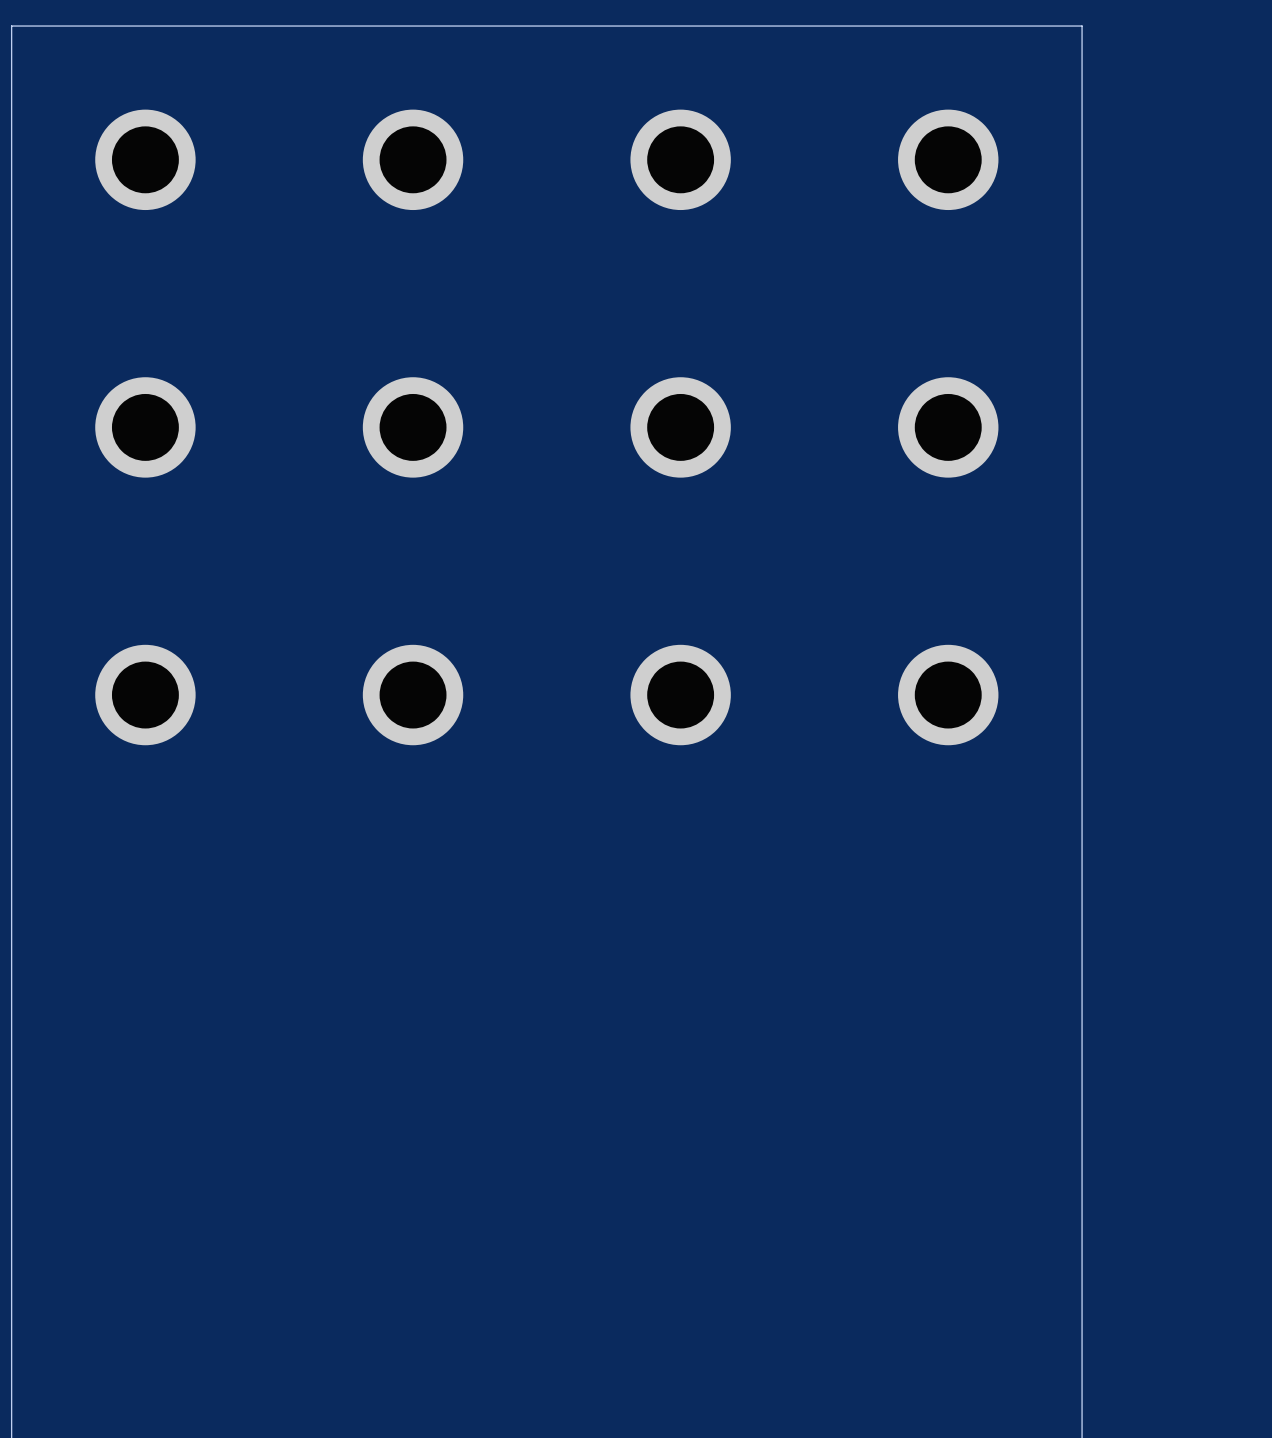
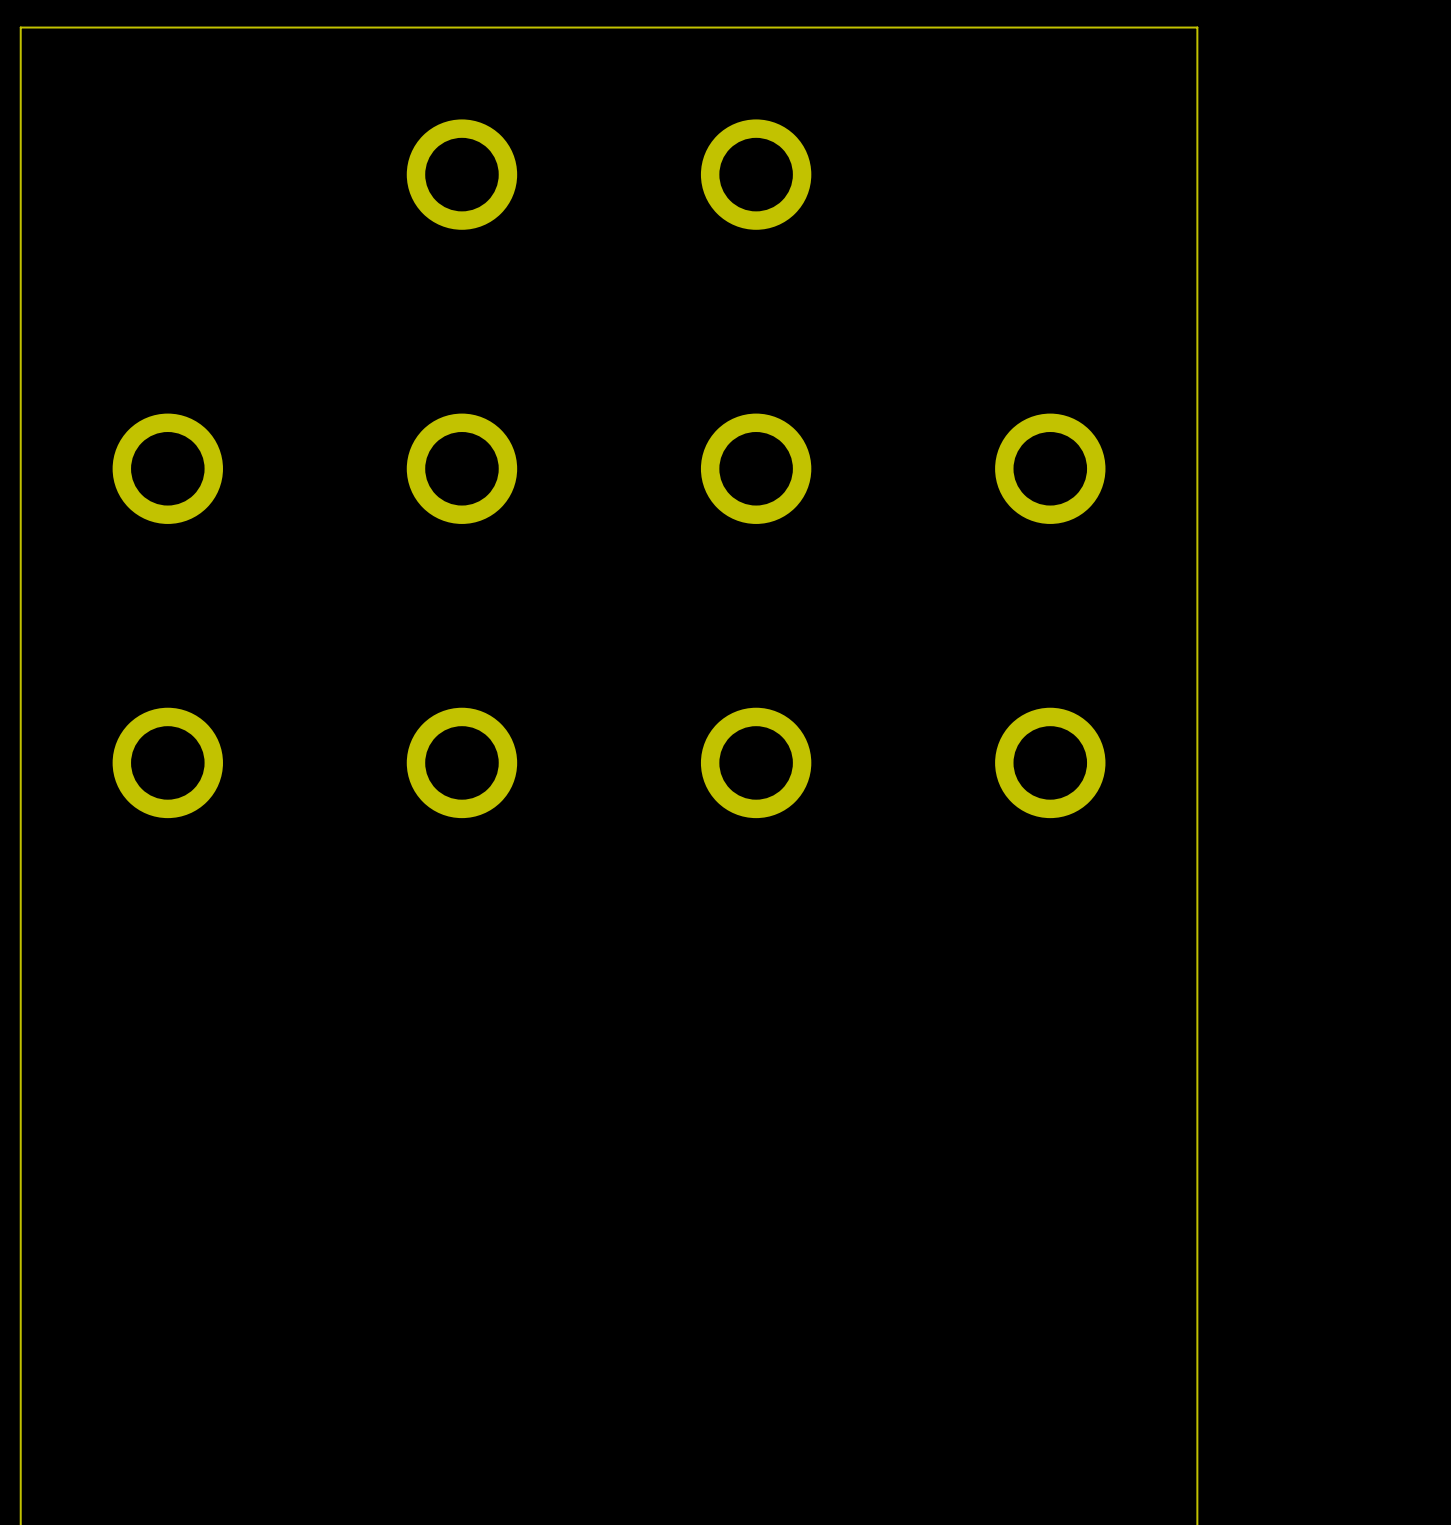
part: (145, 159) -> none
part: (948, 159) -> none

